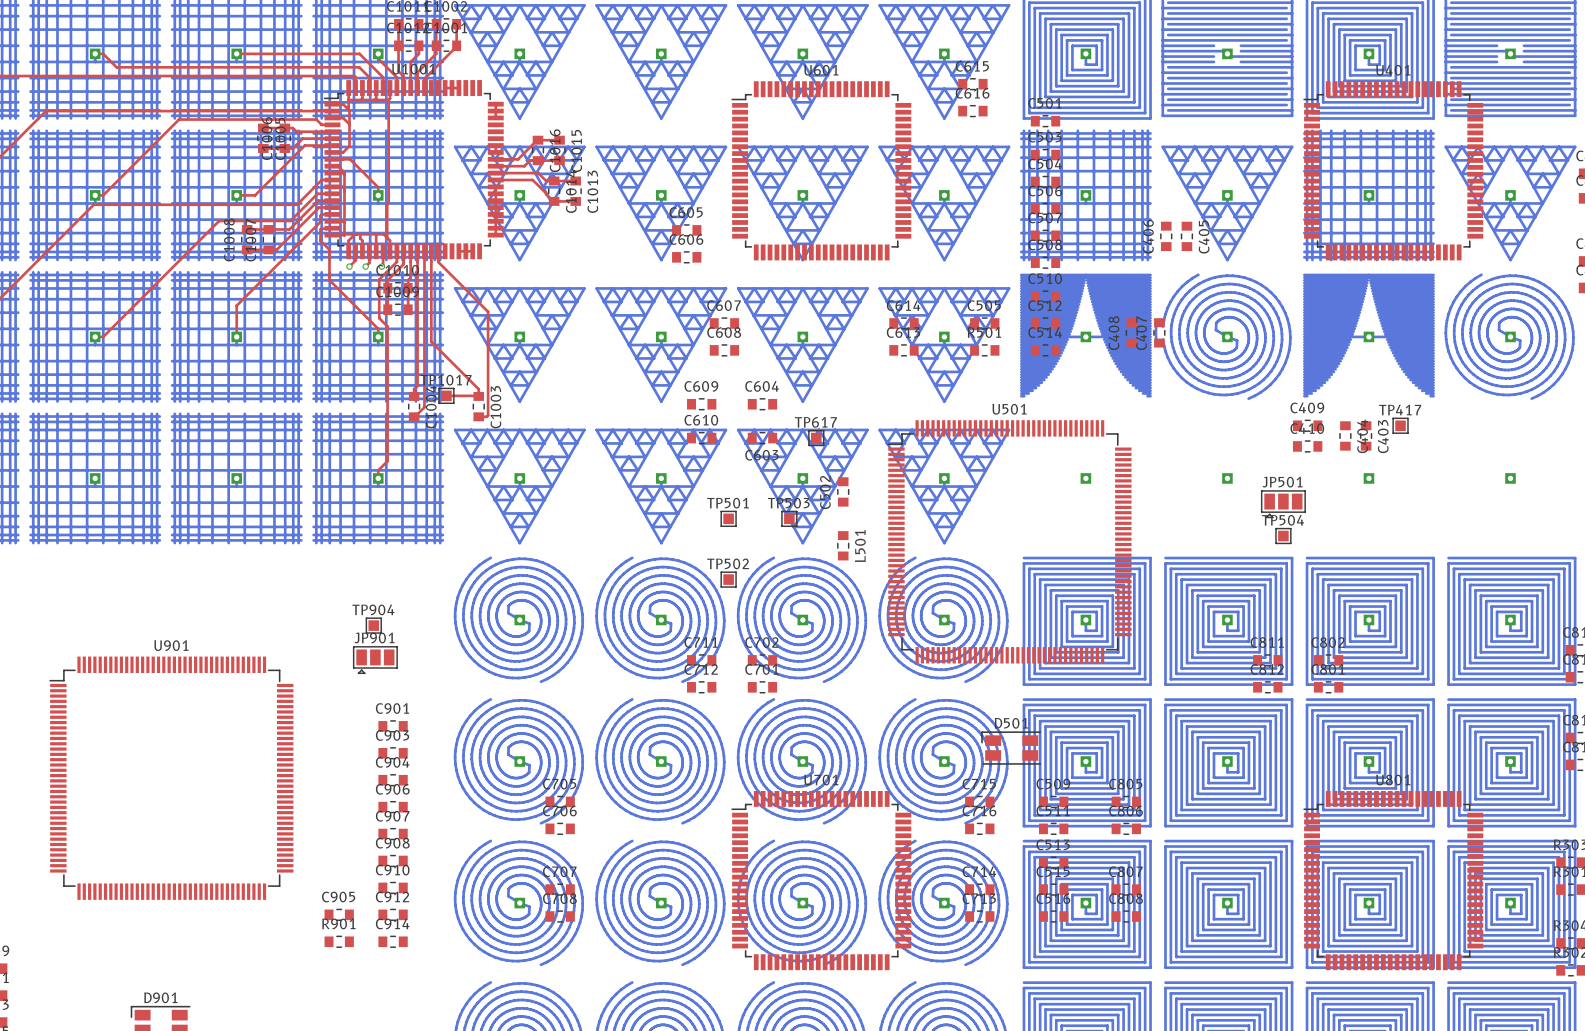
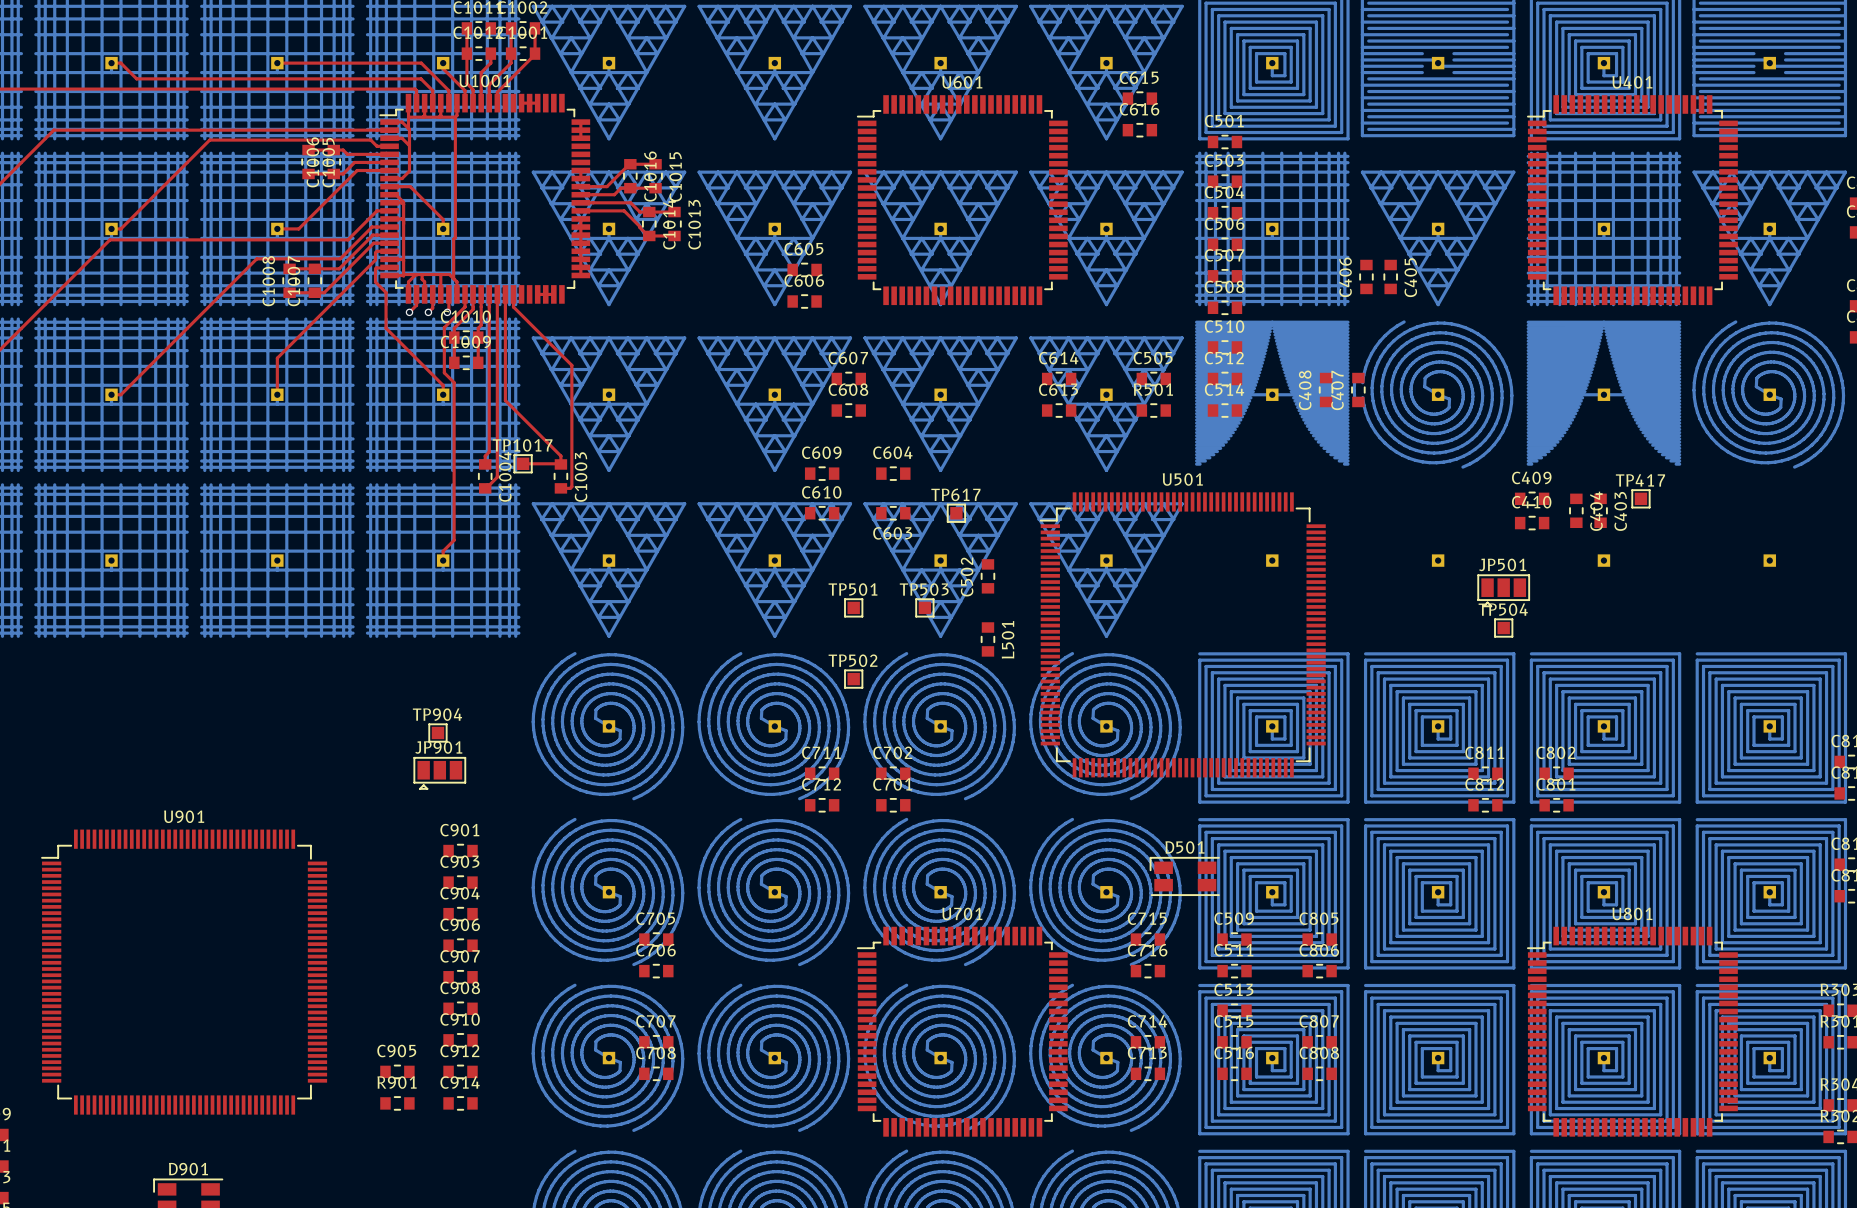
U901 position: (171, 778) -> (184, 972)

